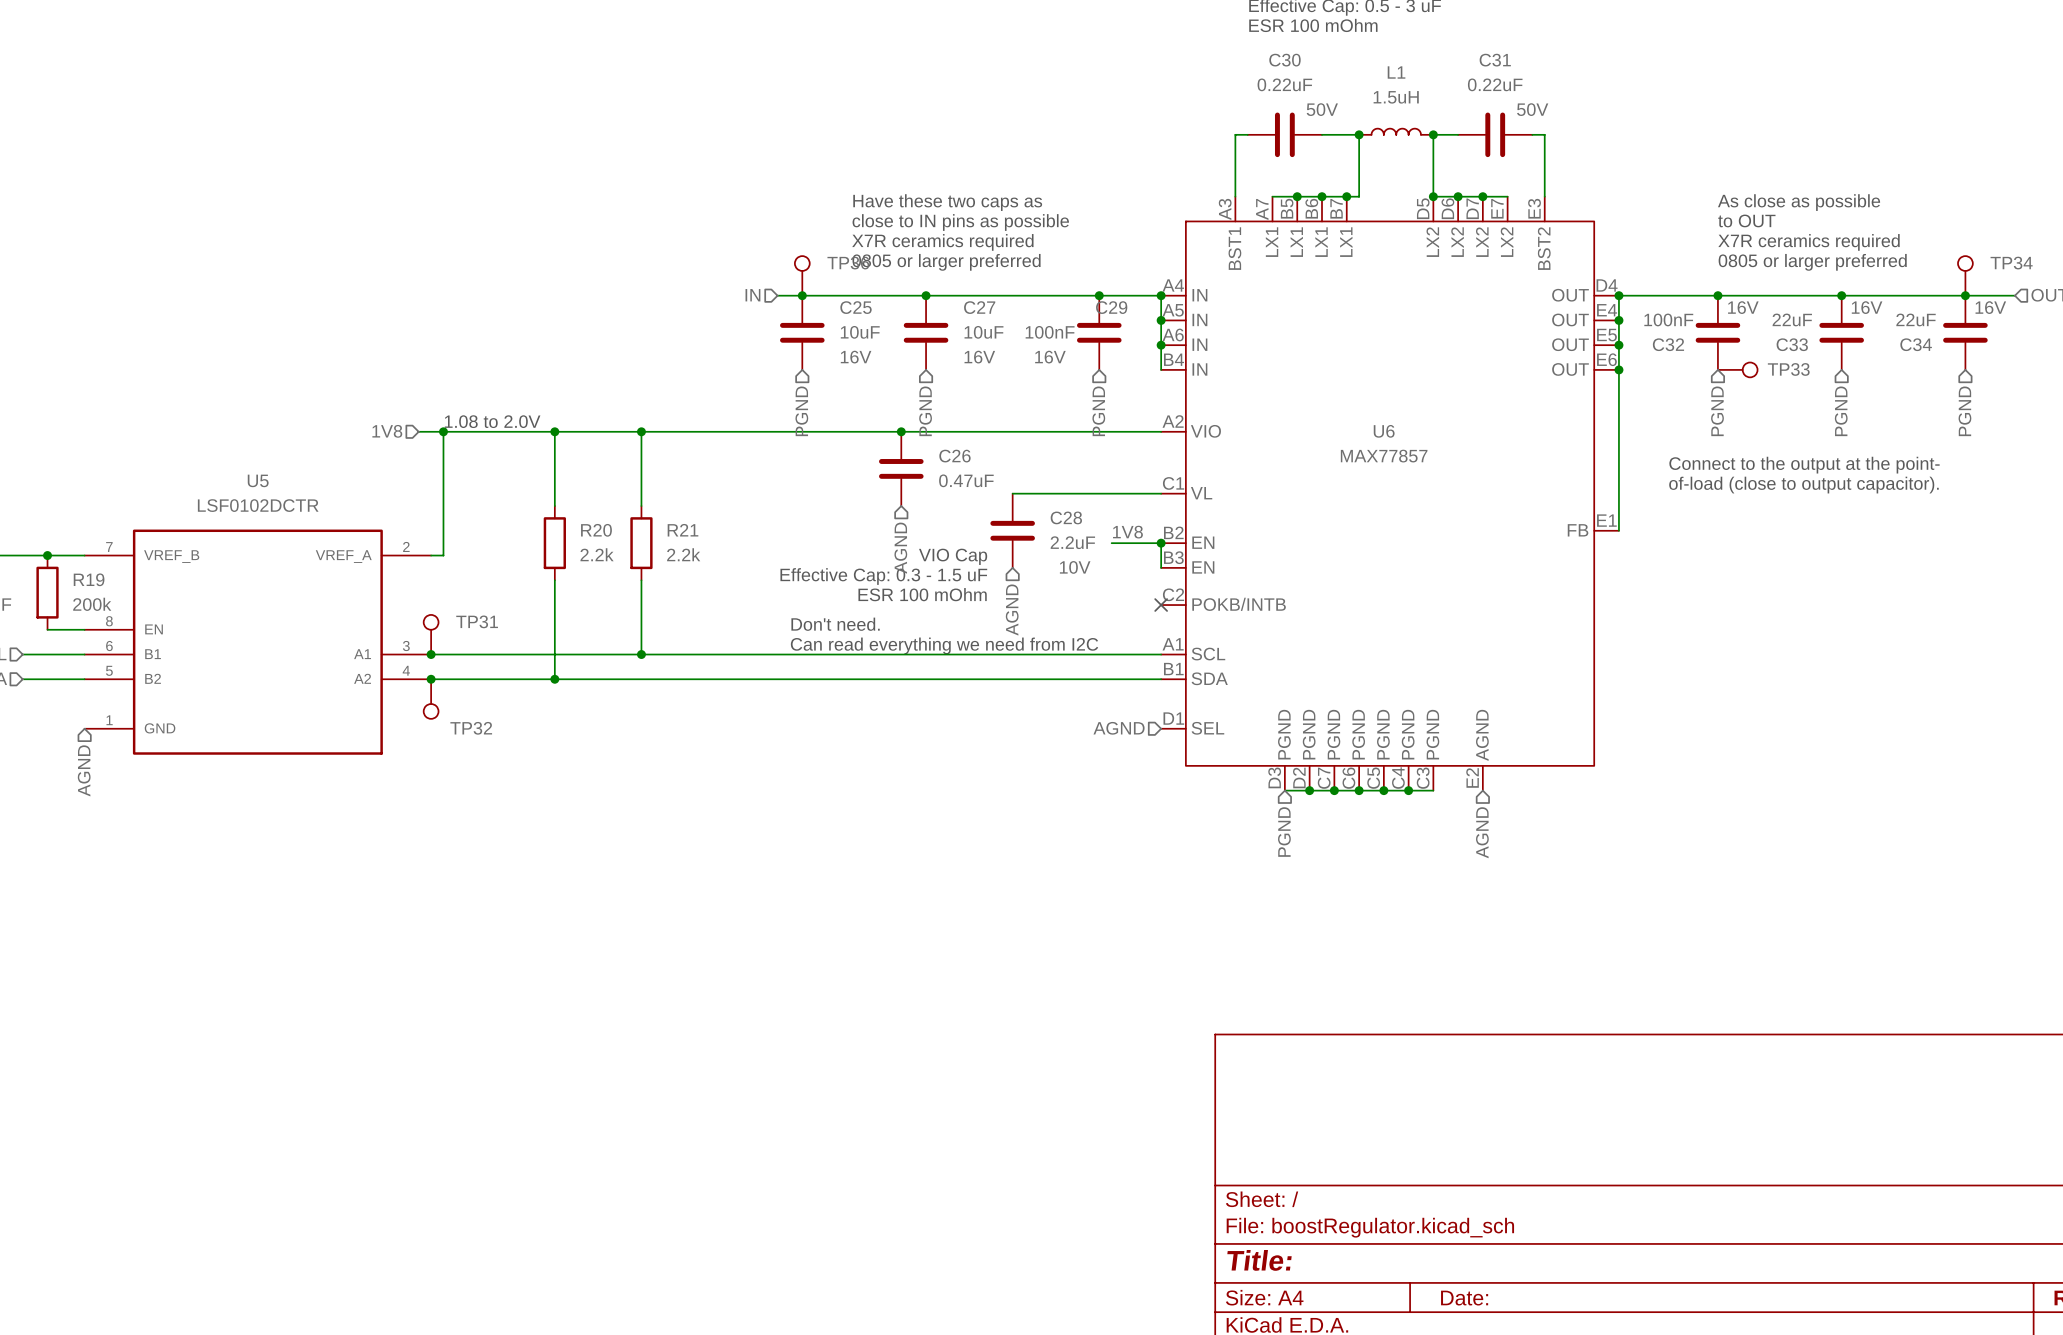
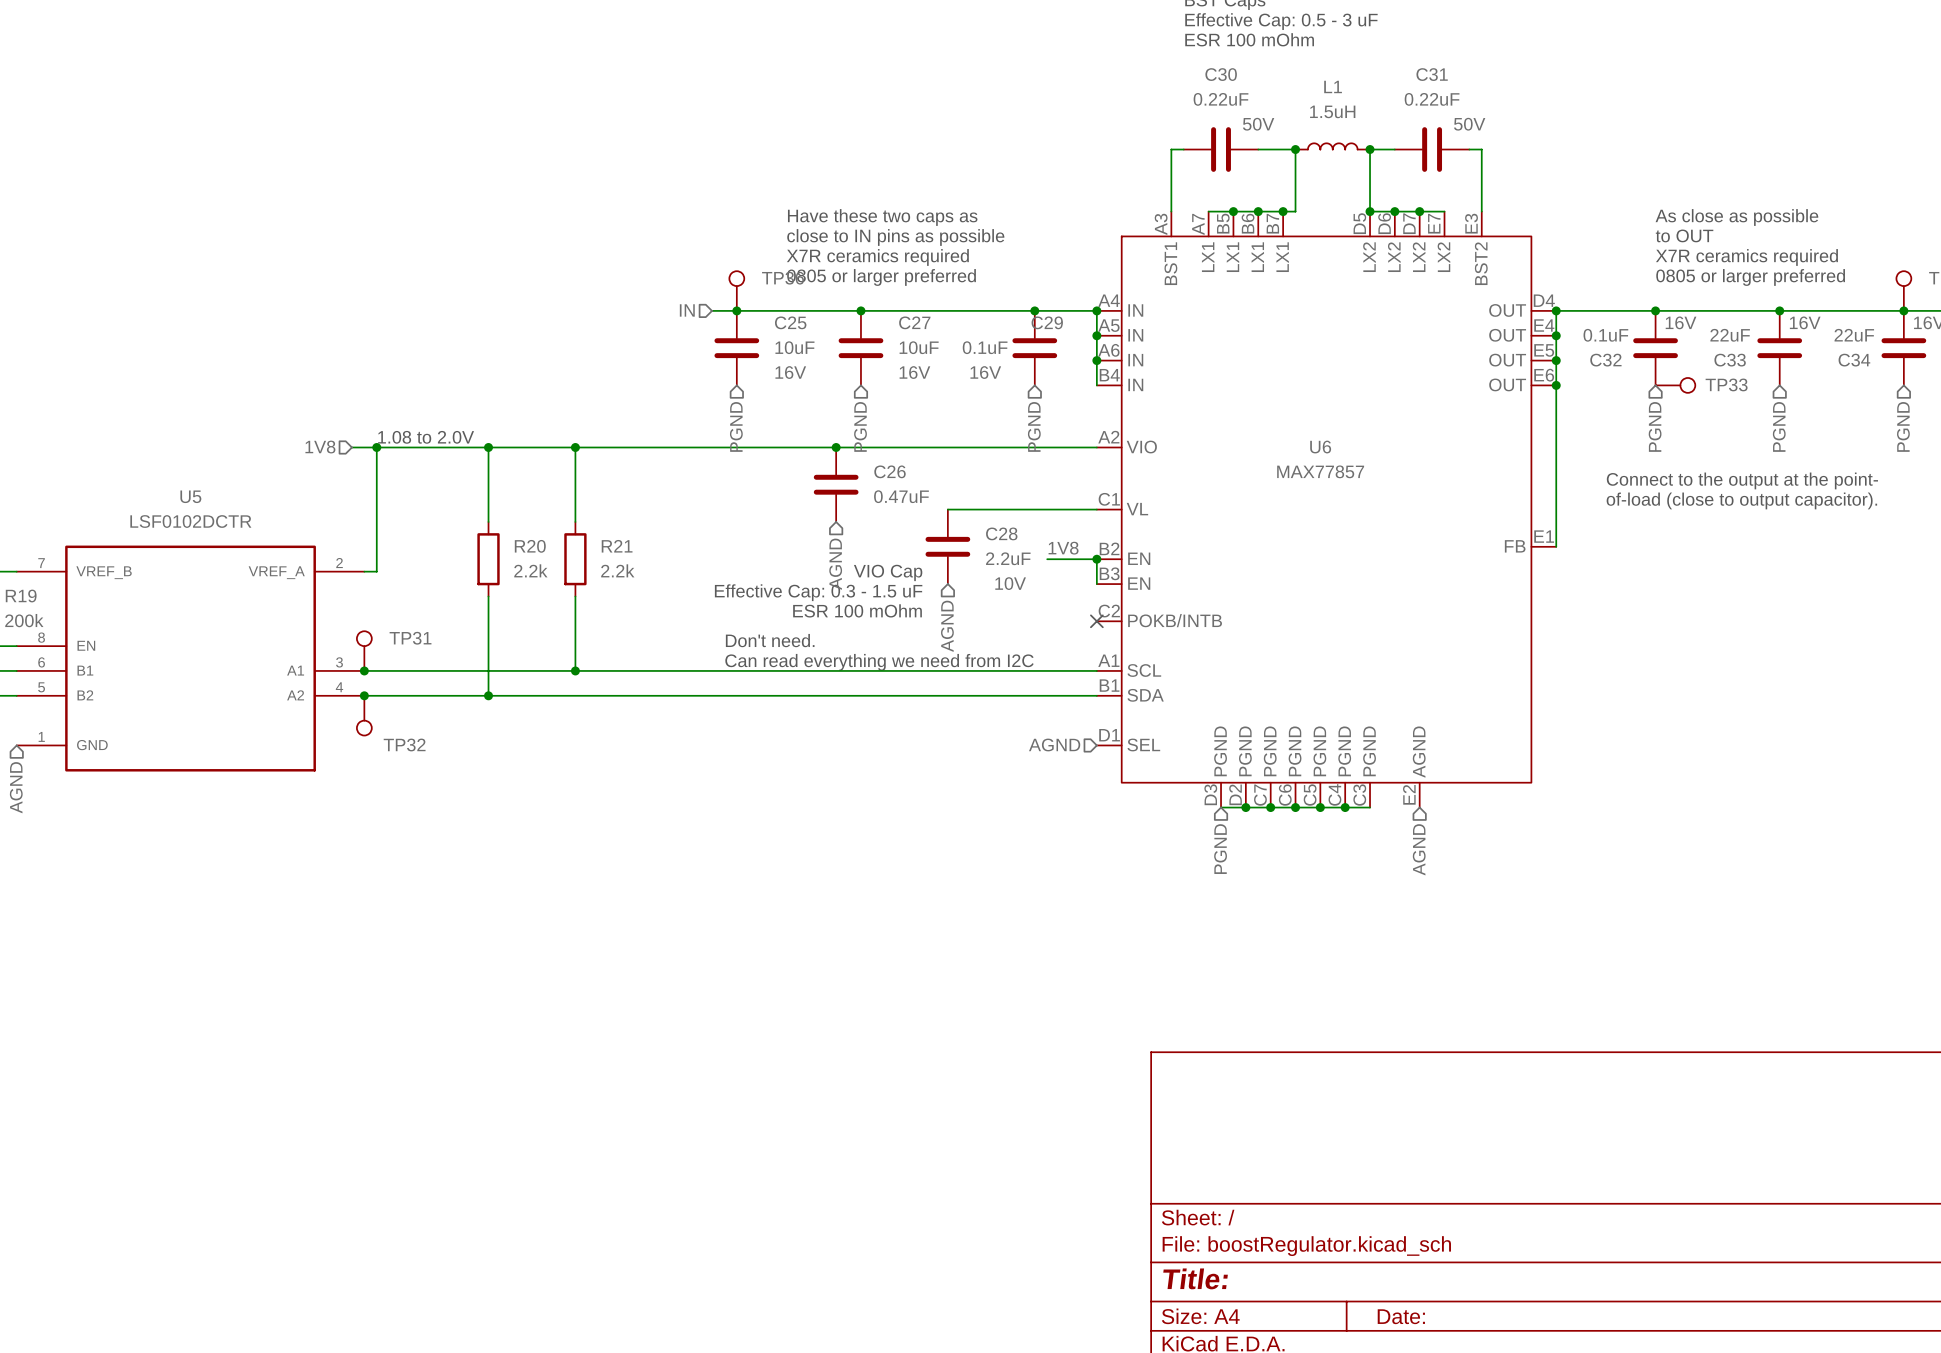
C32 value: 100nF (1668, 319) -> 0.1uF (1605, 335)
C29 value: 100nF (1050, 332) -> 0.1uF (985, 347)

